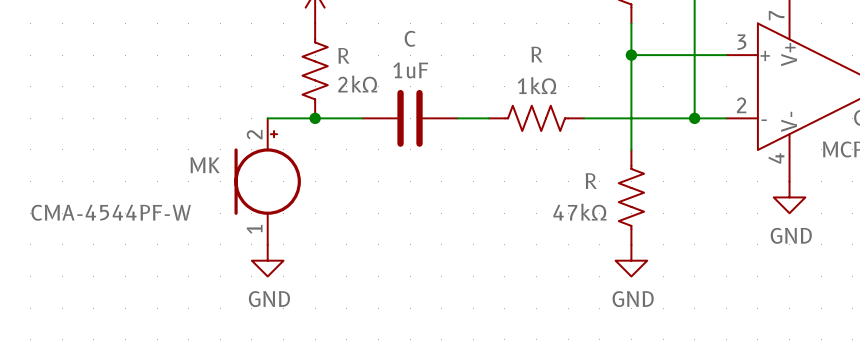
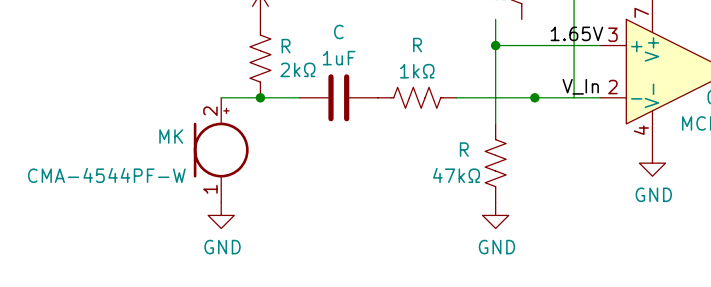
wire: (631, 23) (631, 149) -> (495, 19) (495, 123)
label: none -> 1.65V (576, 33)
wire: none -> (495, 45) (521, 45)
junction position: (631, 55) -> (495, 45)
label: none -> V_In (580, 86)
R position: (536, 118) -> (417, 97)
junction: none -> (534, 97)
junction: (694, 118) -> none
R position: (631, 197) -> (495, 163)
power symbol position: GND (631, 260) -> GND (495, 215)

